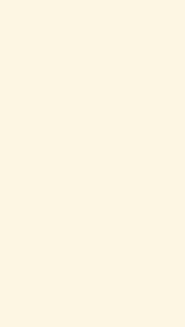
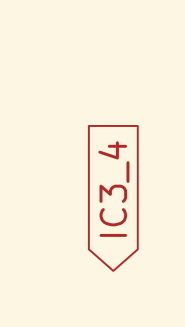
global label: none -> IC3_4 (113, 189)

